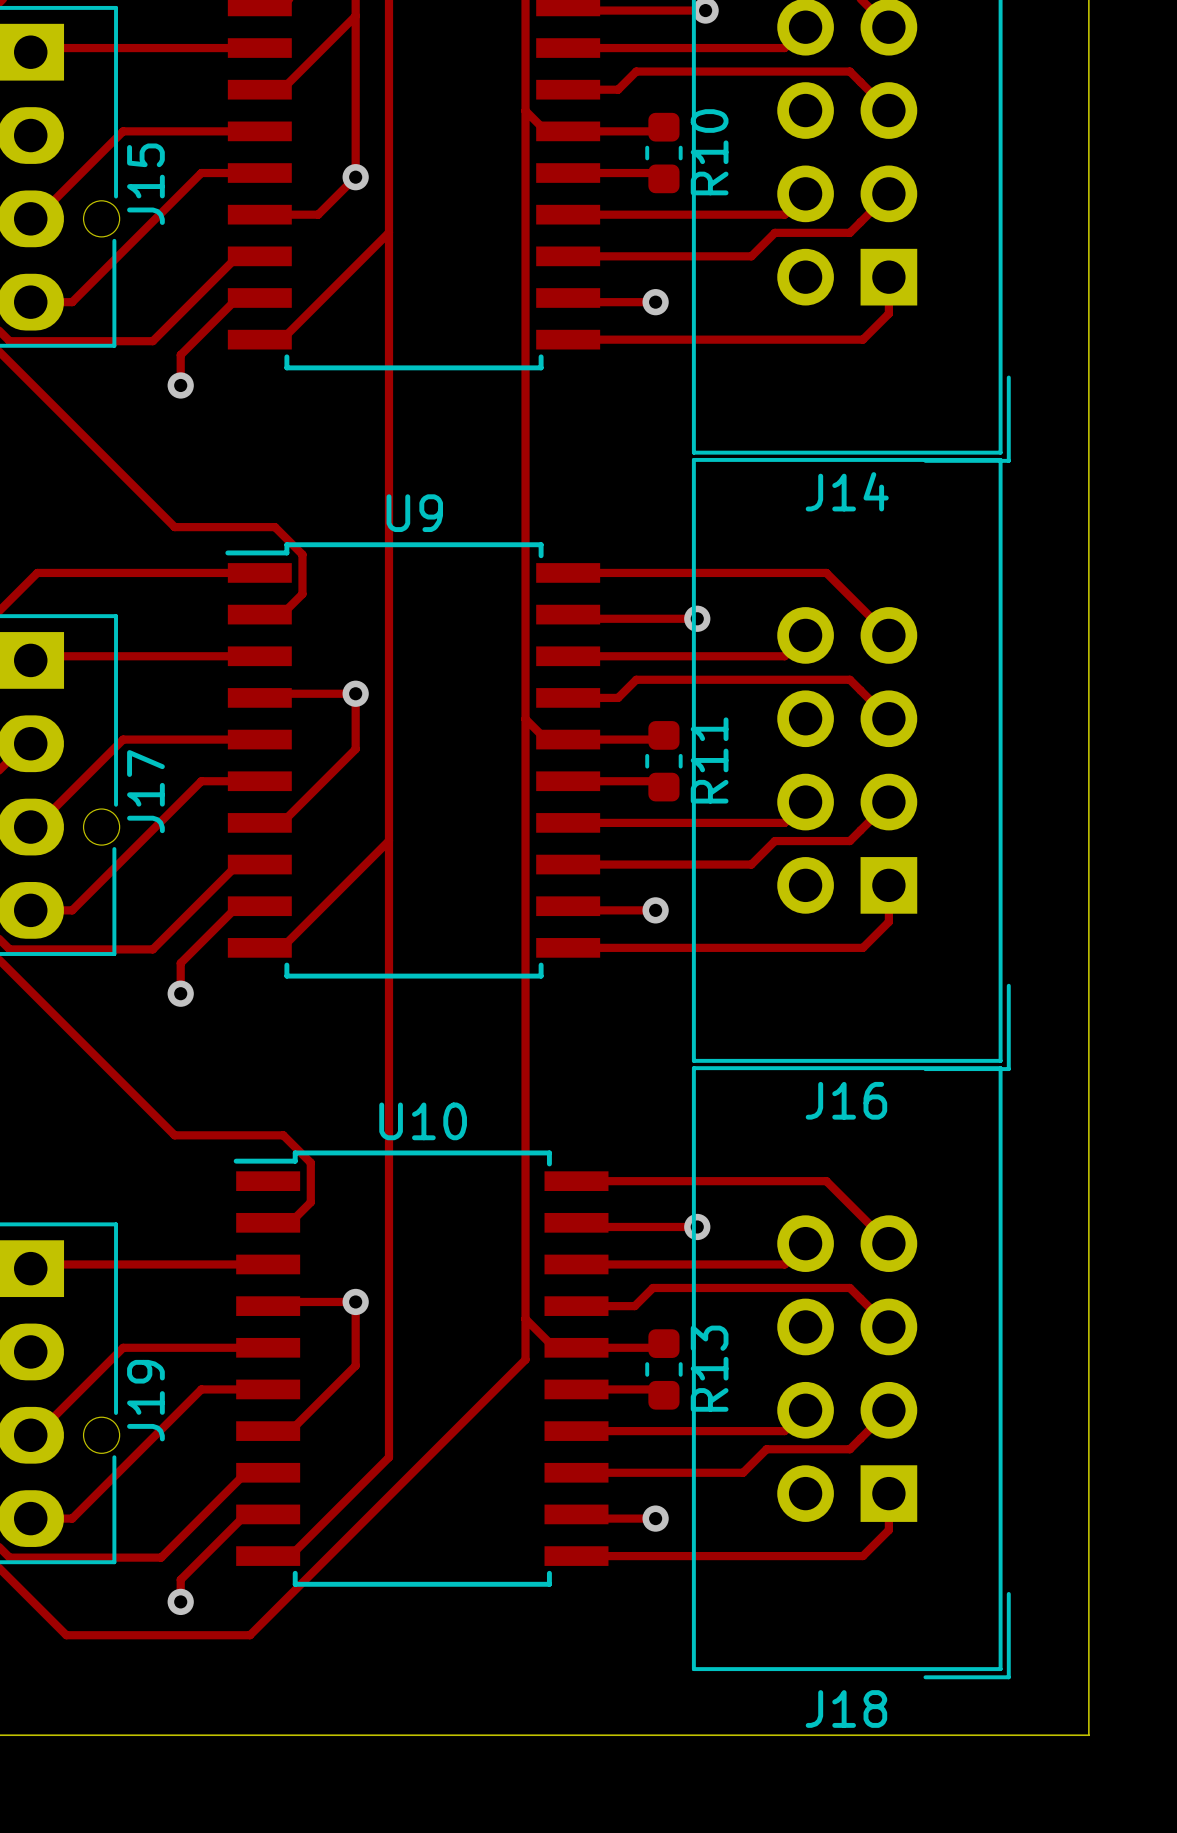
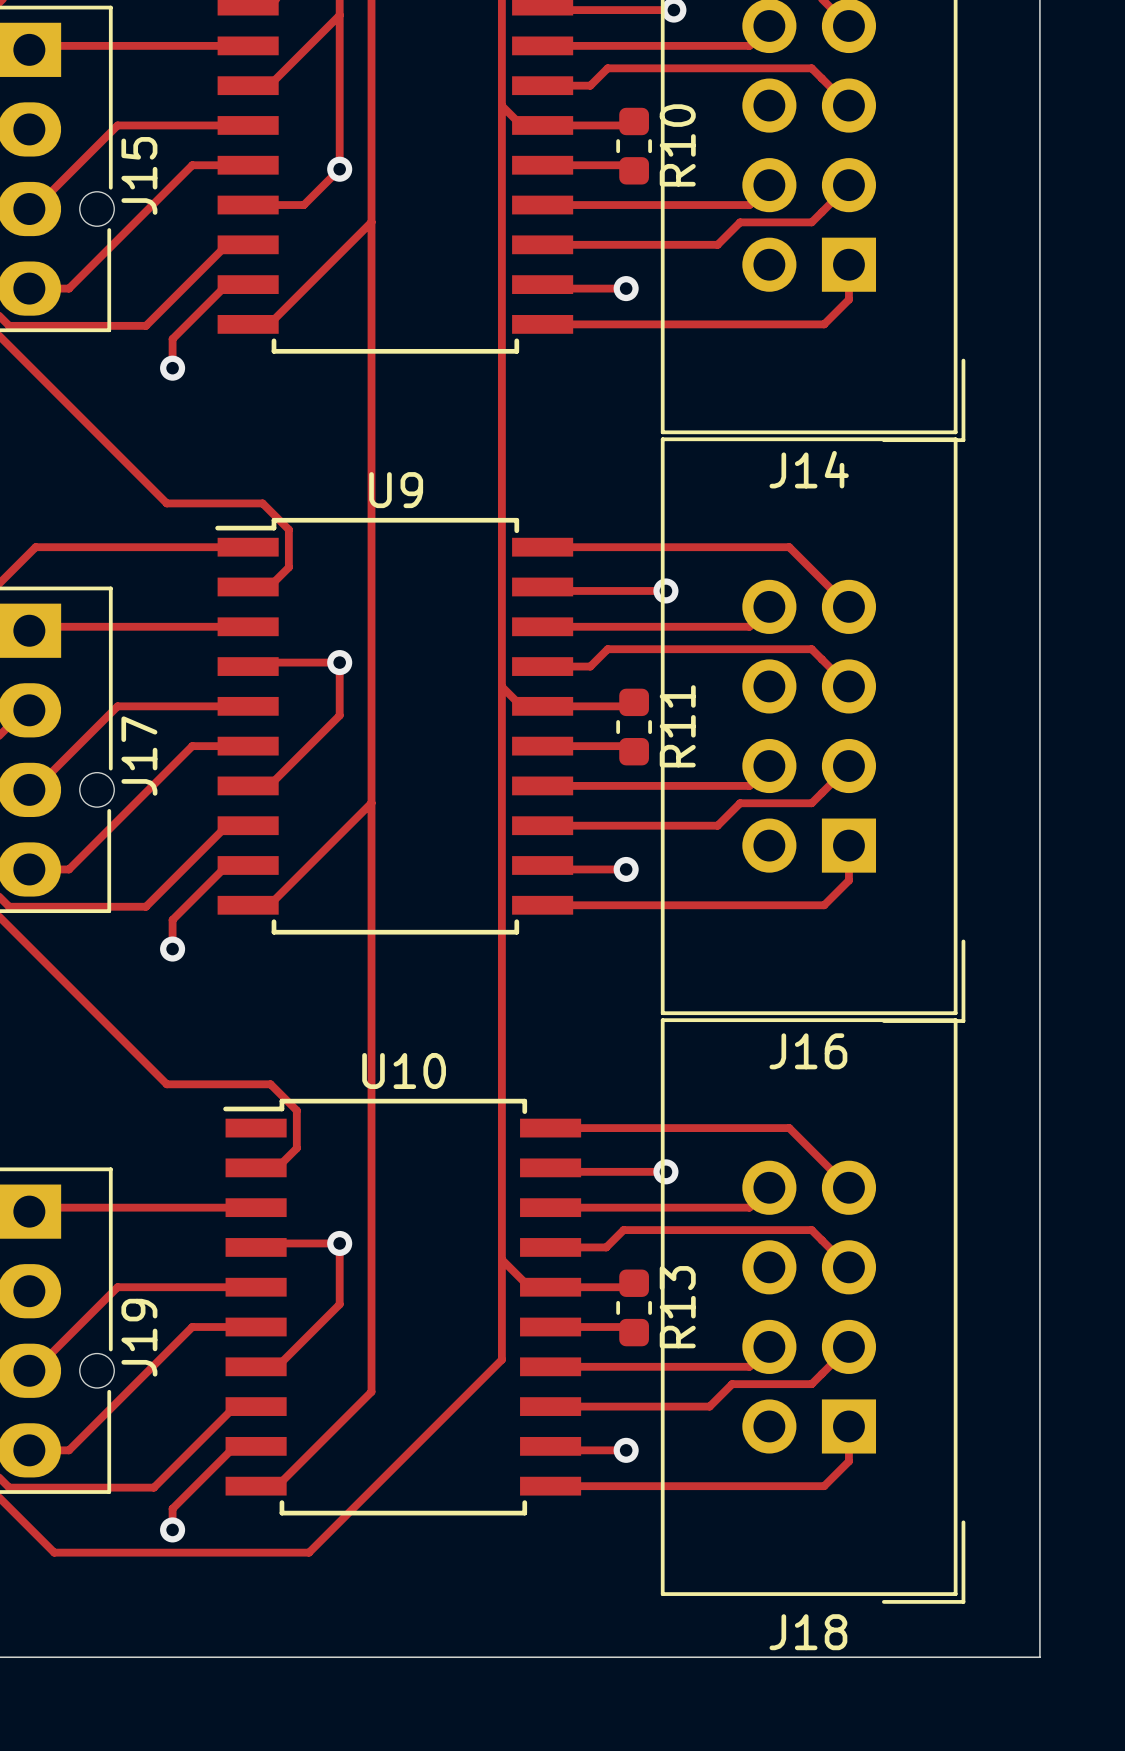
track: (525, 1359) (250, 1635) (66, 1635) (56, 1625) -> (501, 1298) (501, 1359) (309, 1552) (54, 1552)

